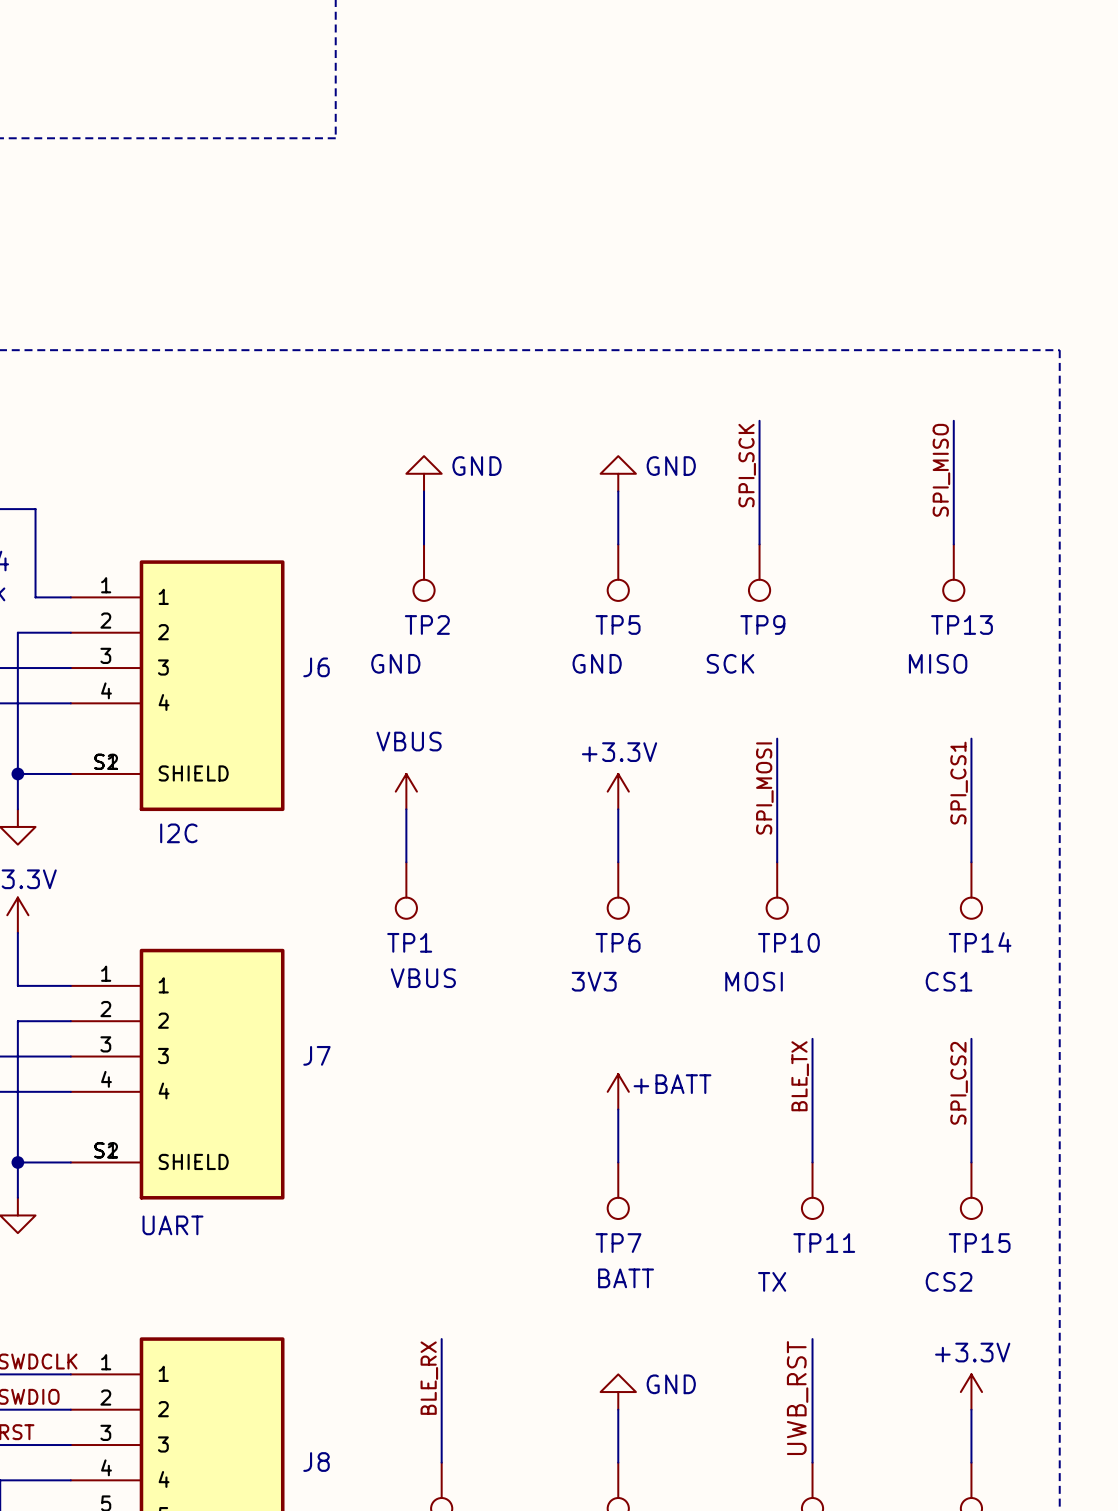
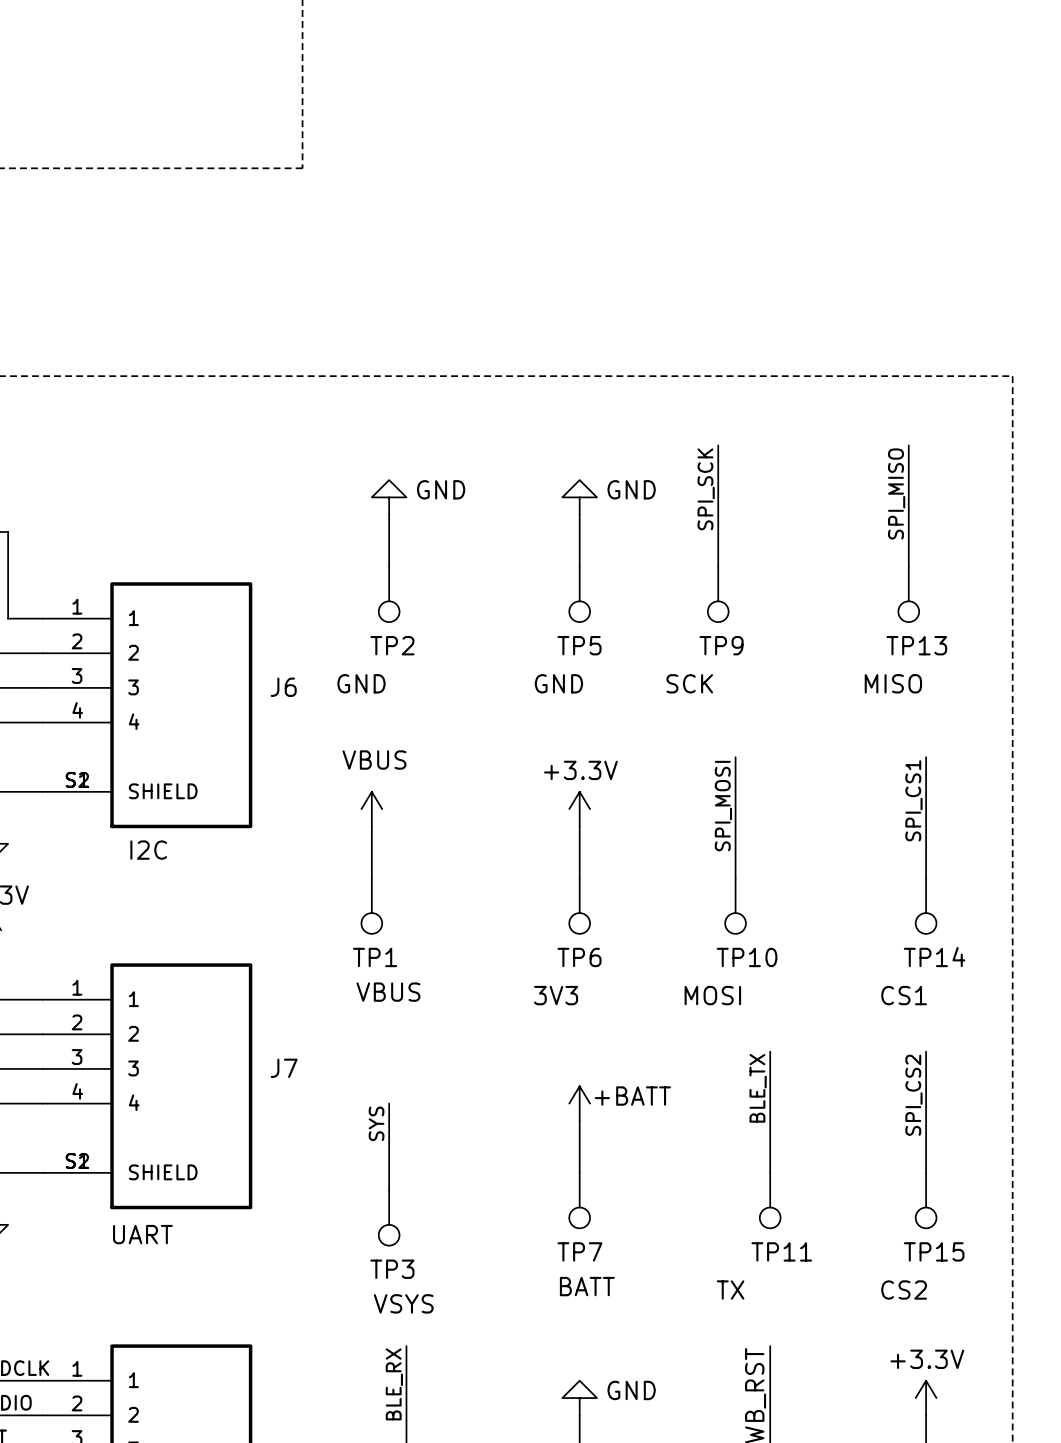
wire: none -> (389, 1103) (389, 1190)
label: none -> SYS (376, 1123)
TP3: none -> VSYS (389, 1217)

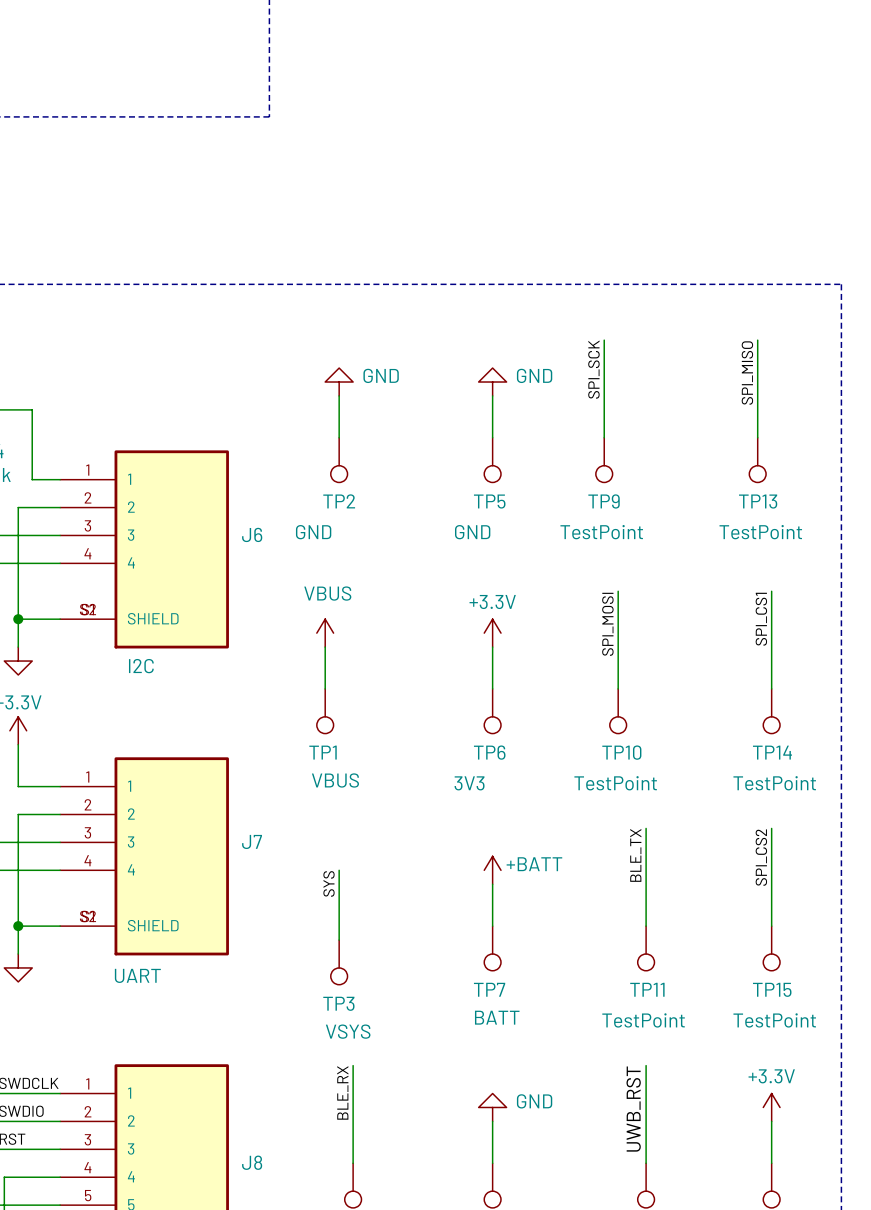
TP9 value: SCK (689, 683) -> TestPoint (601, 532)
TP13 value: MISO (893, 683) -> TestPoint (760, 532)
TP10 value: MOSI (712, 995) -> TestPoint (615, 783)
TP14 value: CS1 (904, 995) -> TestPoint (774, 783)
TP11 value: TX (730, 1290) -> TestPoint (643, 1020)
TP15 value: CS2 (904, 1290) -> TestPoint (774, 1020)

